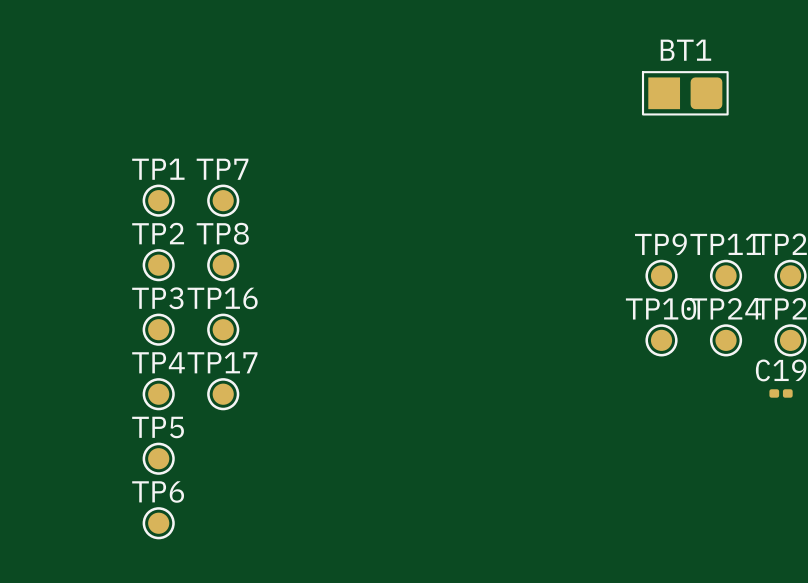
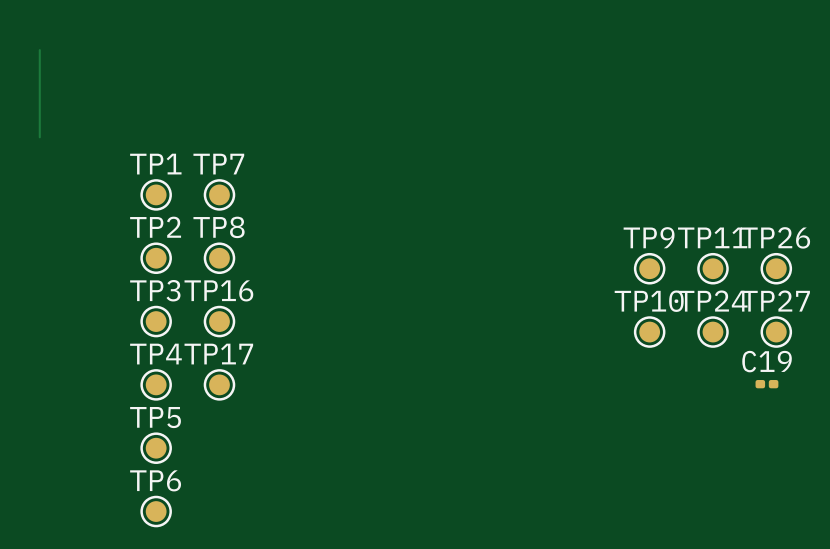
track: none -> (39, 50) (39, 137)
BT1: (685, 93) -> none

